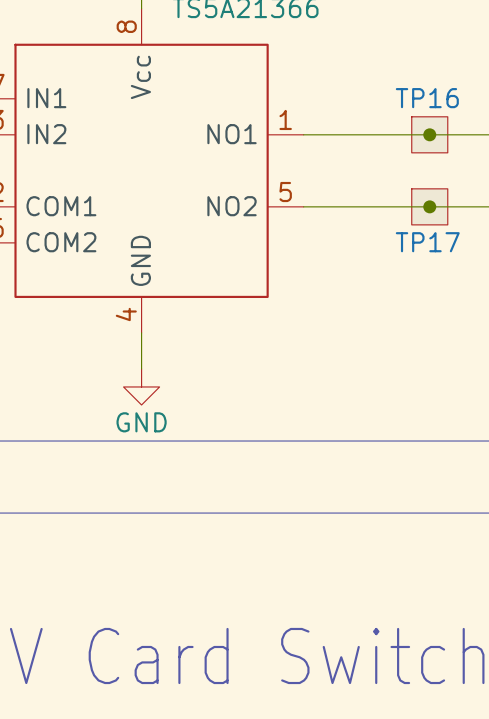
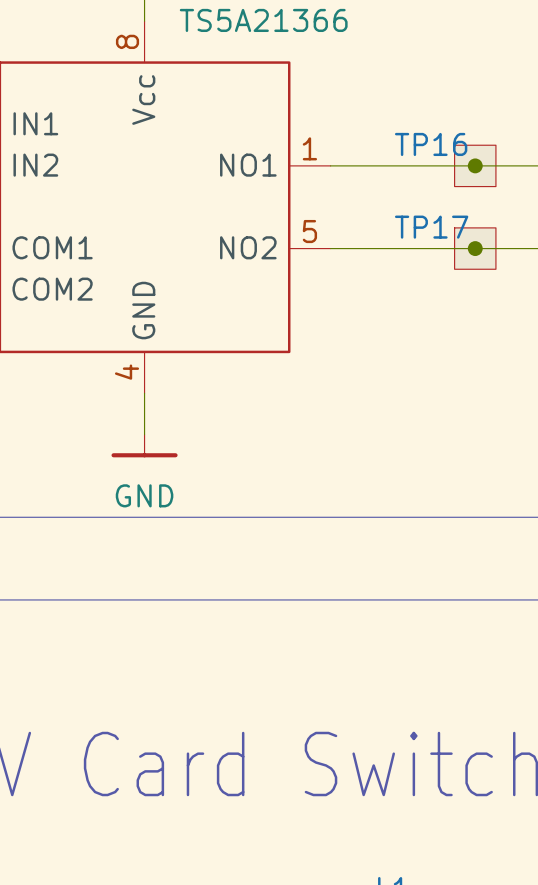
TP16 name position: TP16 (427, 98) -> TP16 (431, 144)
TP17 name position: TP17 (427, 242) -> TP17 (431, 227)
power symbol shape: [123, 368, 160, 405] -> [111, 434, 178, 458]

